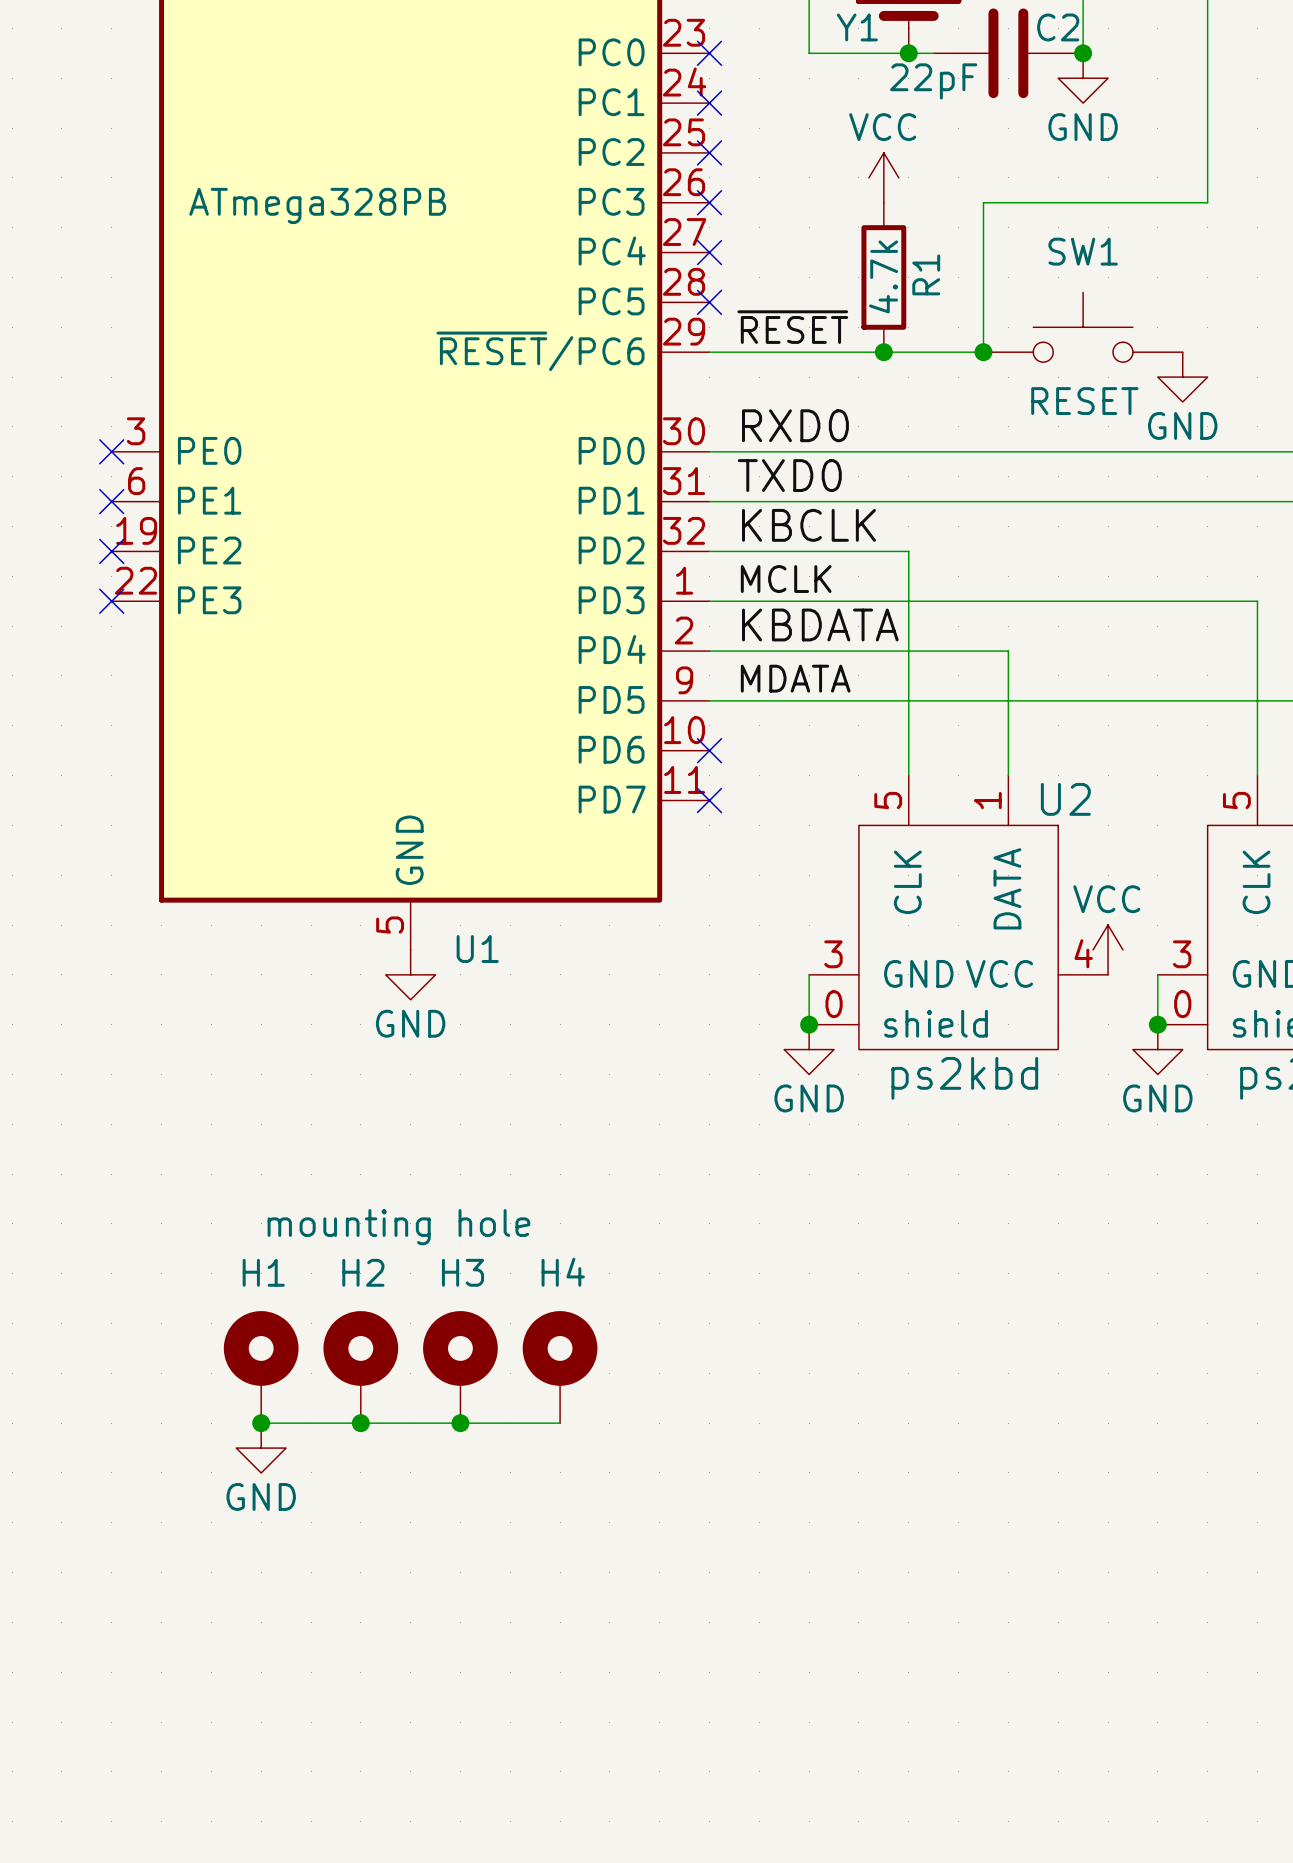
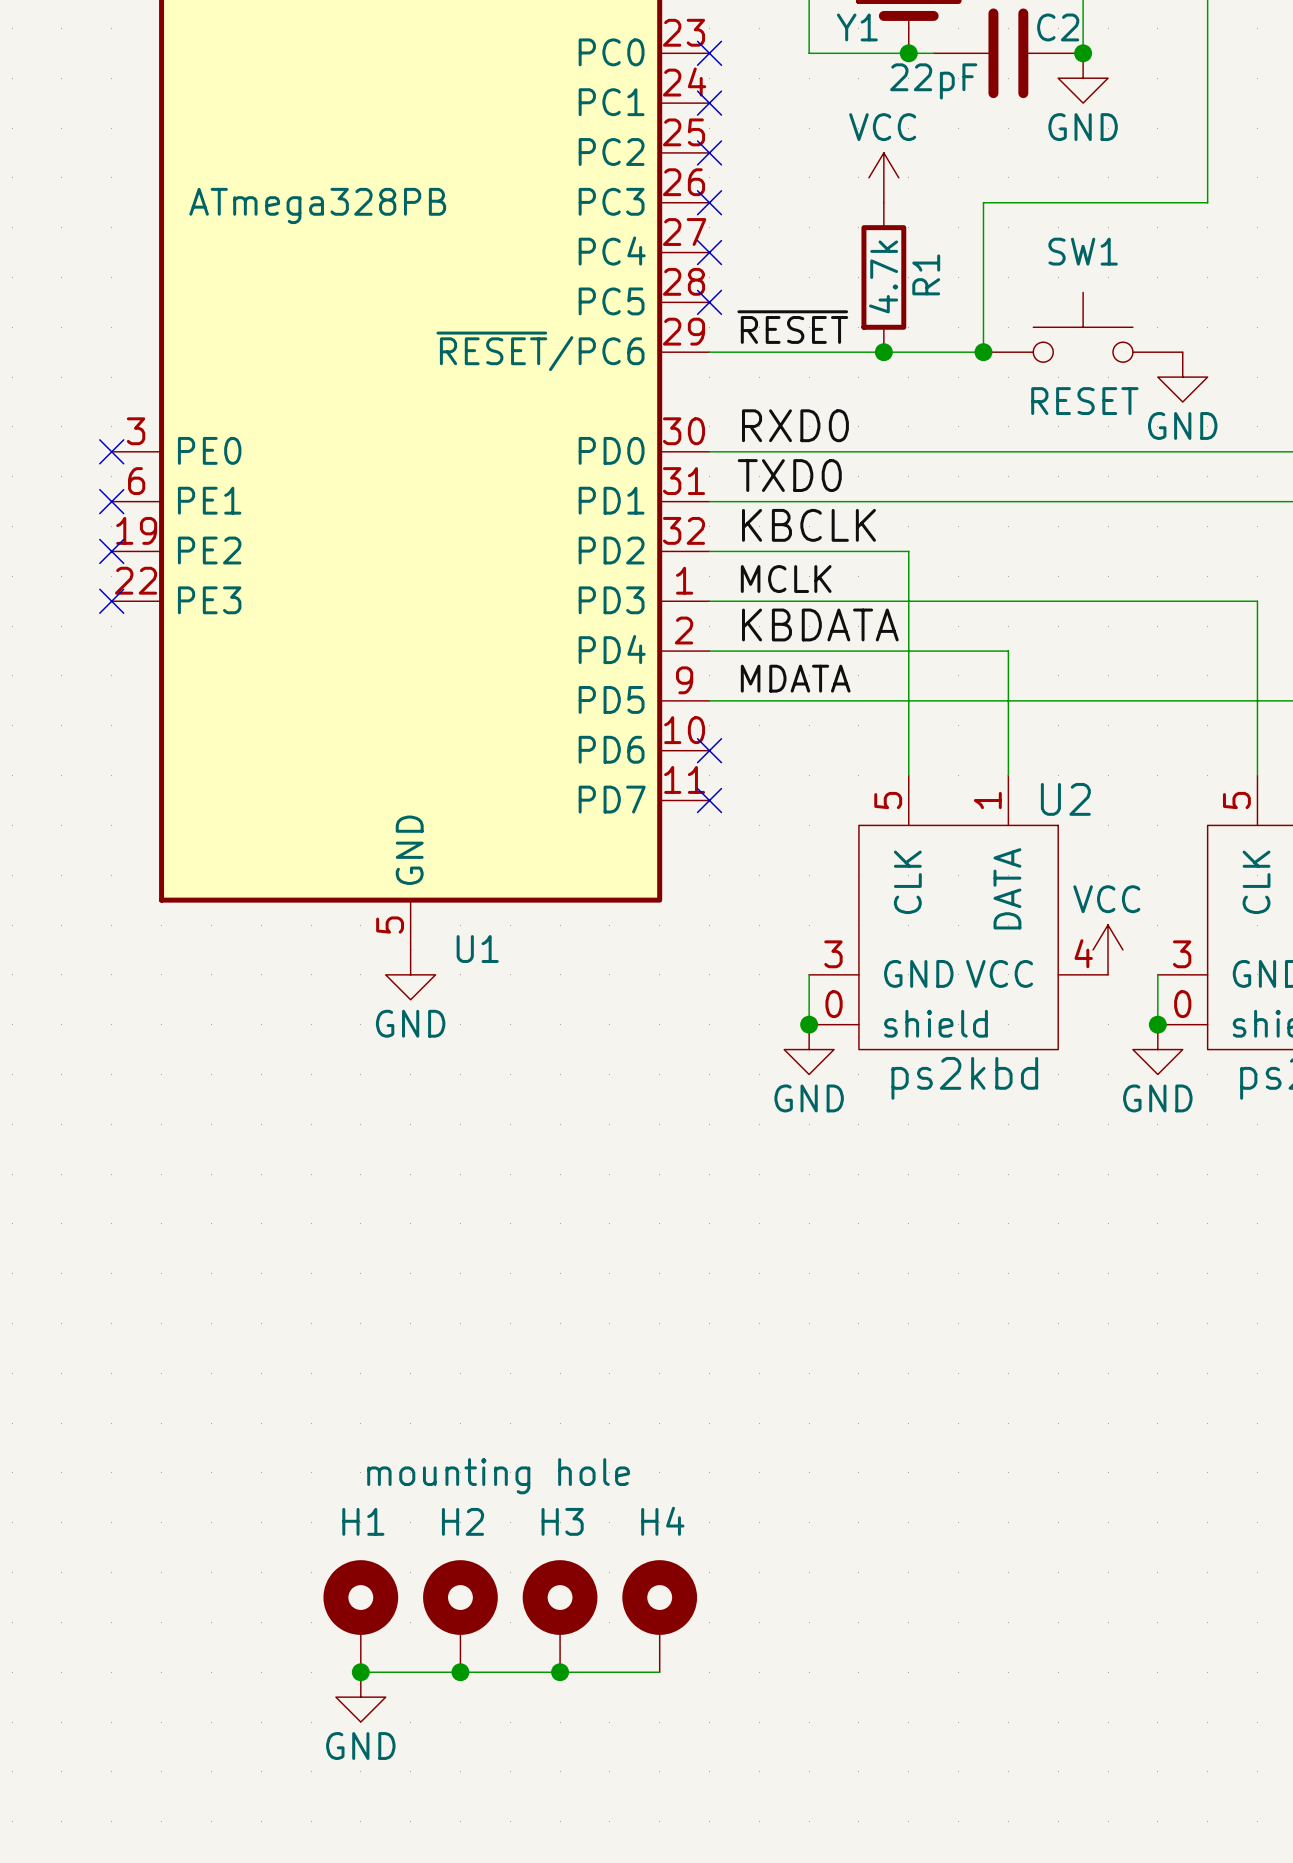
H1 position: (261, 1367) -> (360, 1616)
H2 position: (360, 1367) -> (460, 1616)
H3 position: (460, 1367) -> (560, 1616)
H4 position: (560, 1367) -> (659, 1616)
wire: (261, 1423) (560, 1423) -> (360, 1672) (659, 1672)
junction: (261, 1423) -> none
junction: (360, 1423) -> none
junction: (460, 1423) -> none
power symbol position: GND (261, 1448) -> GND (360, 1697)
junction: none -> (360, 1672)
junction: none -> (460, 1672)
junction: none -> (560, 1672)

